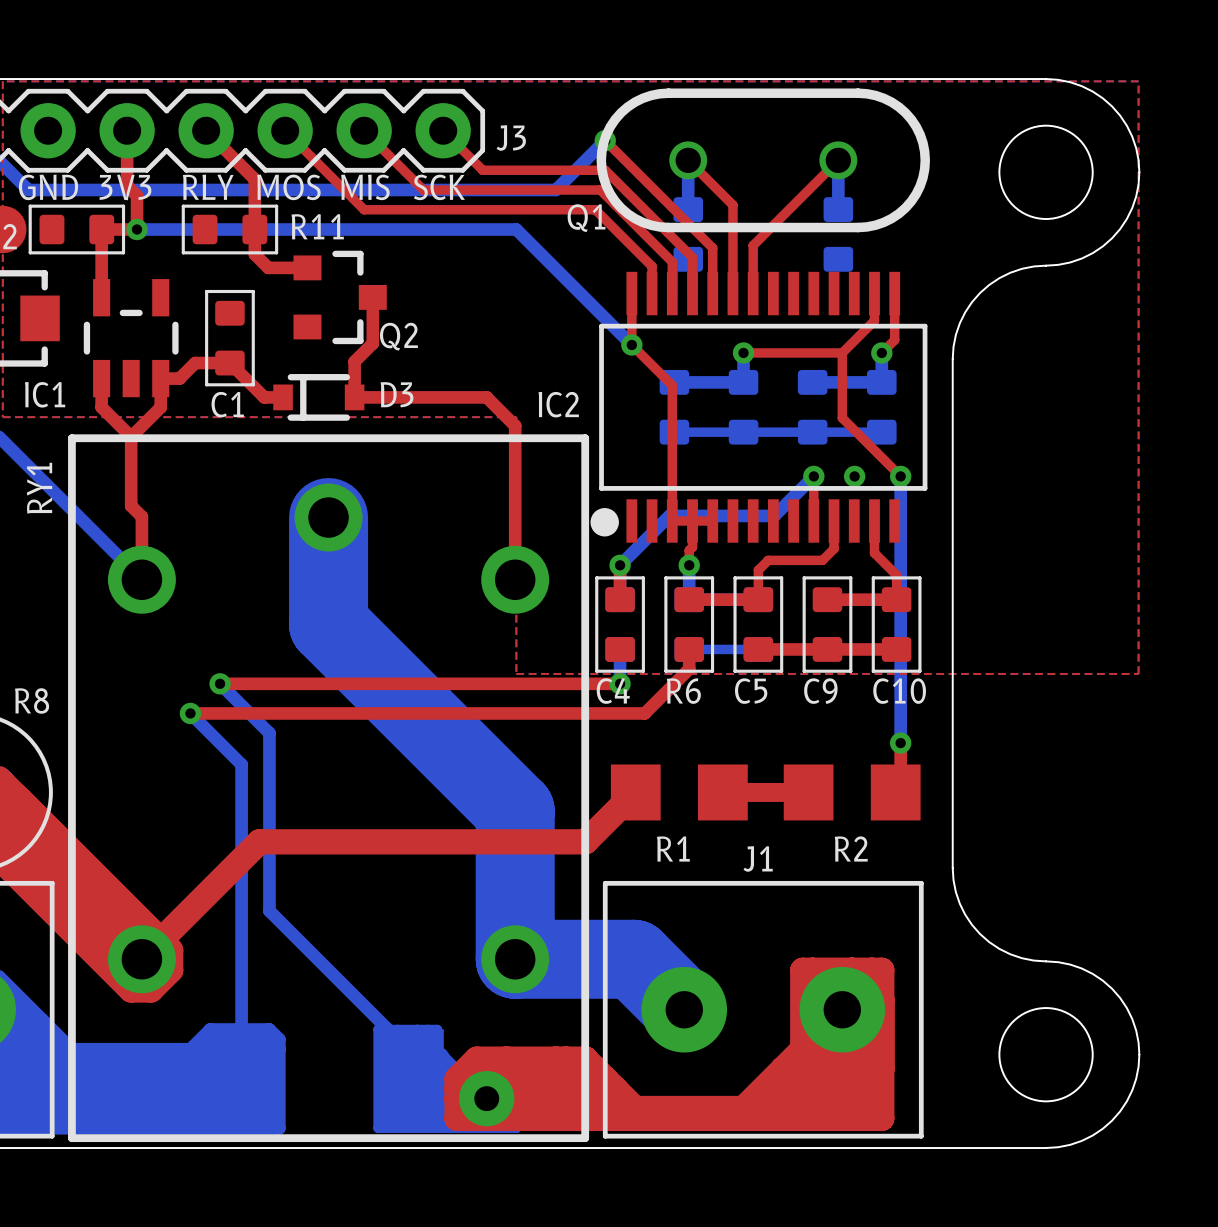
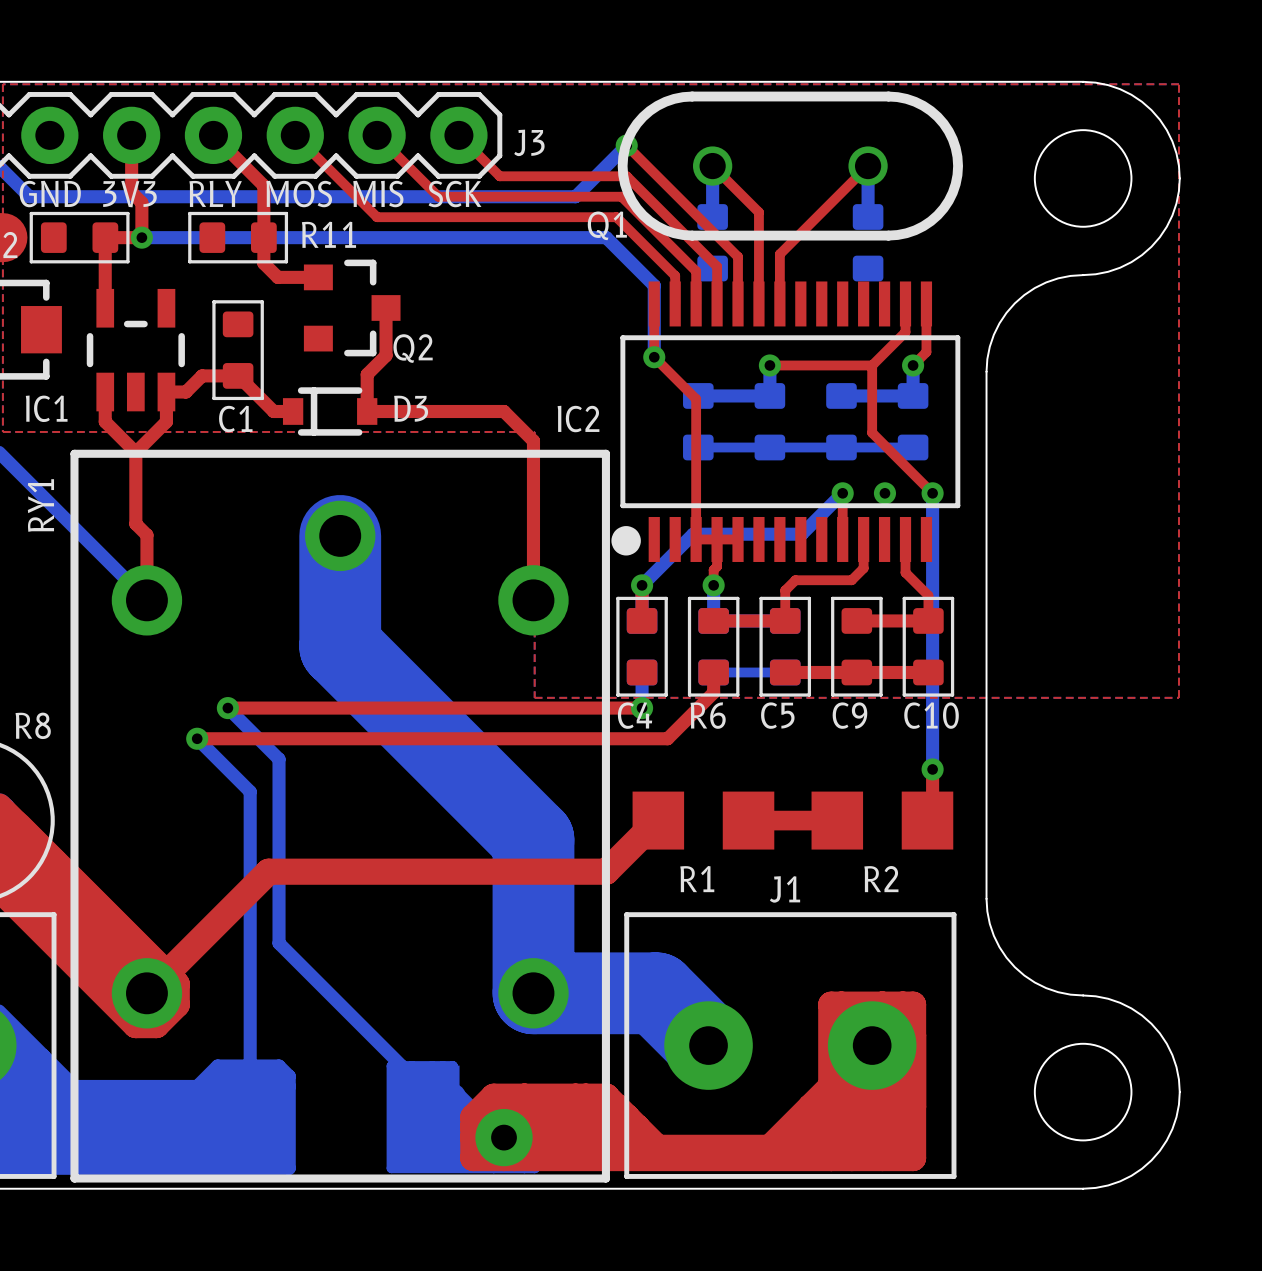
bottom track: (516, 229) (631, 344) -> (534, 237) (606, 237) (654, 285) (654, 357)

